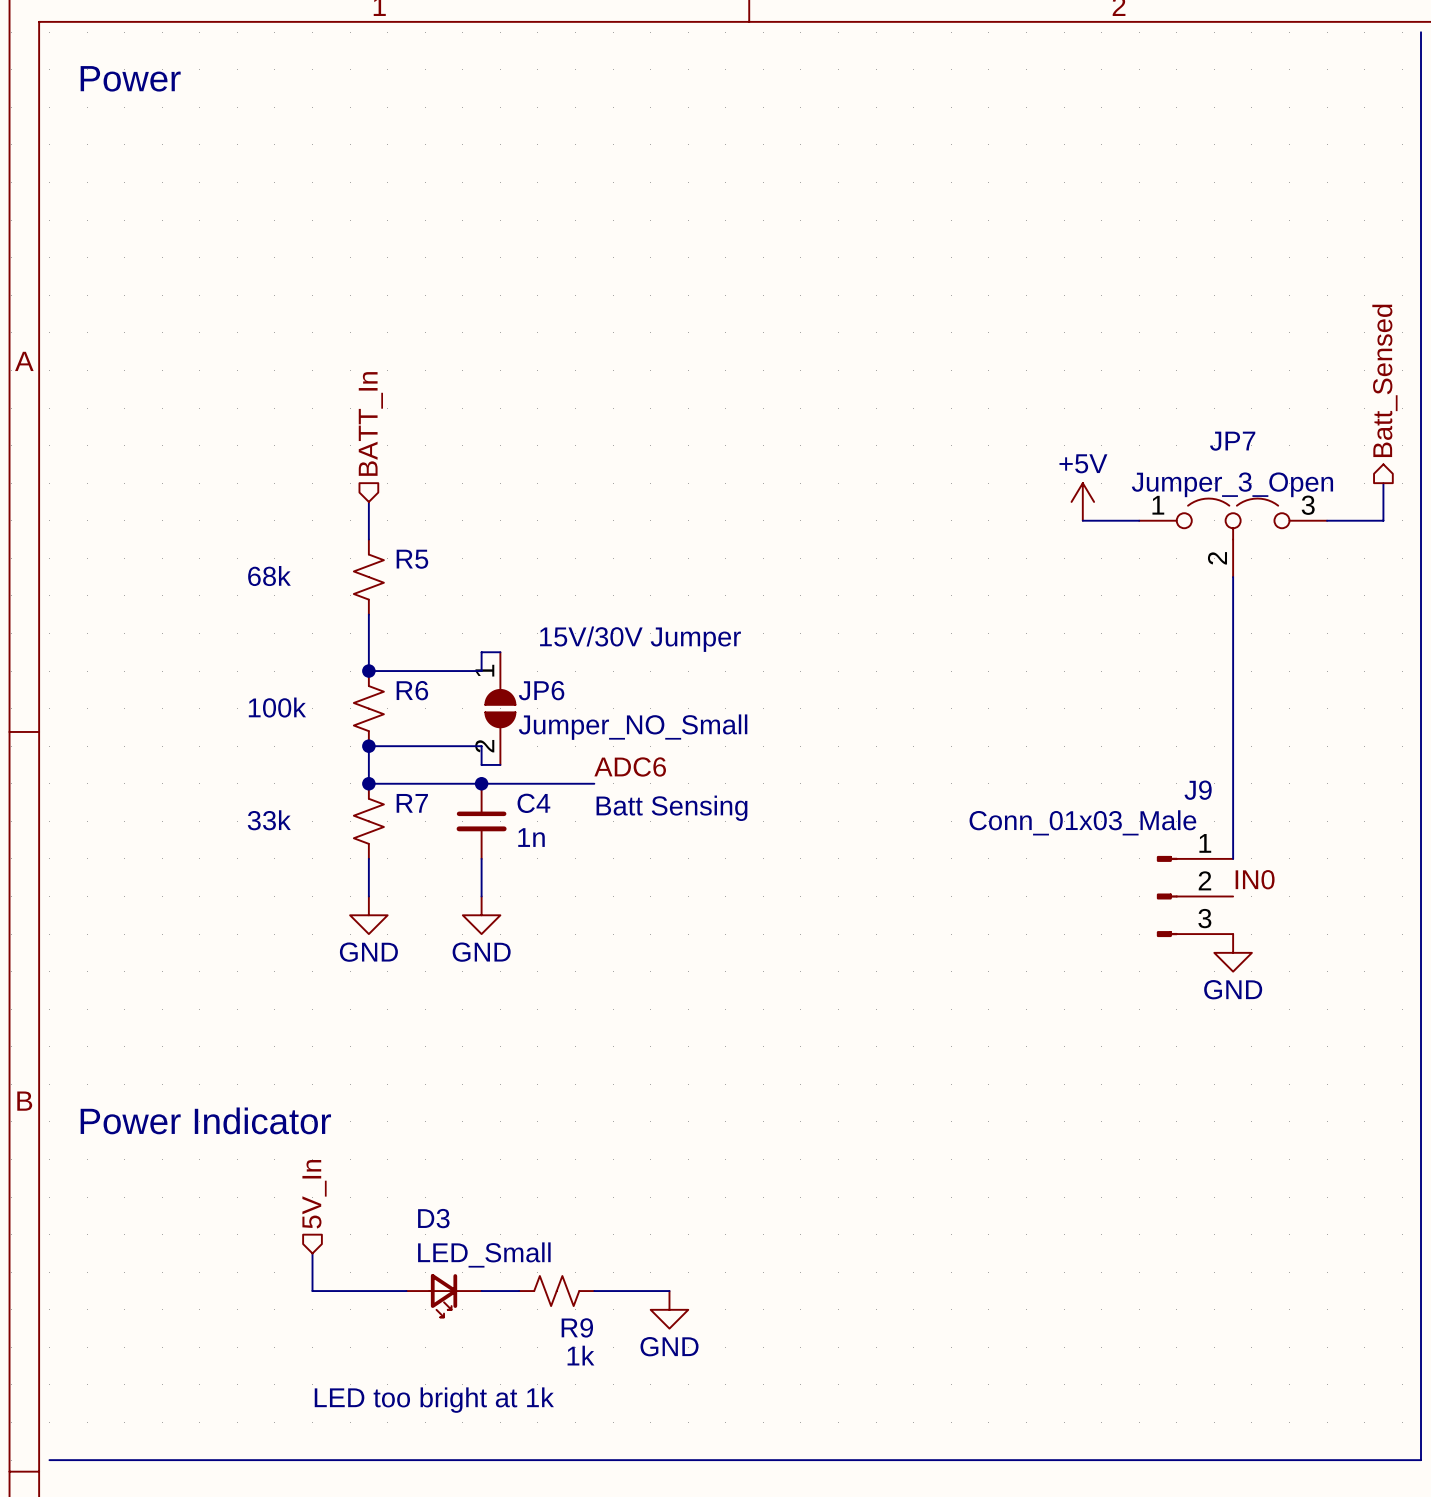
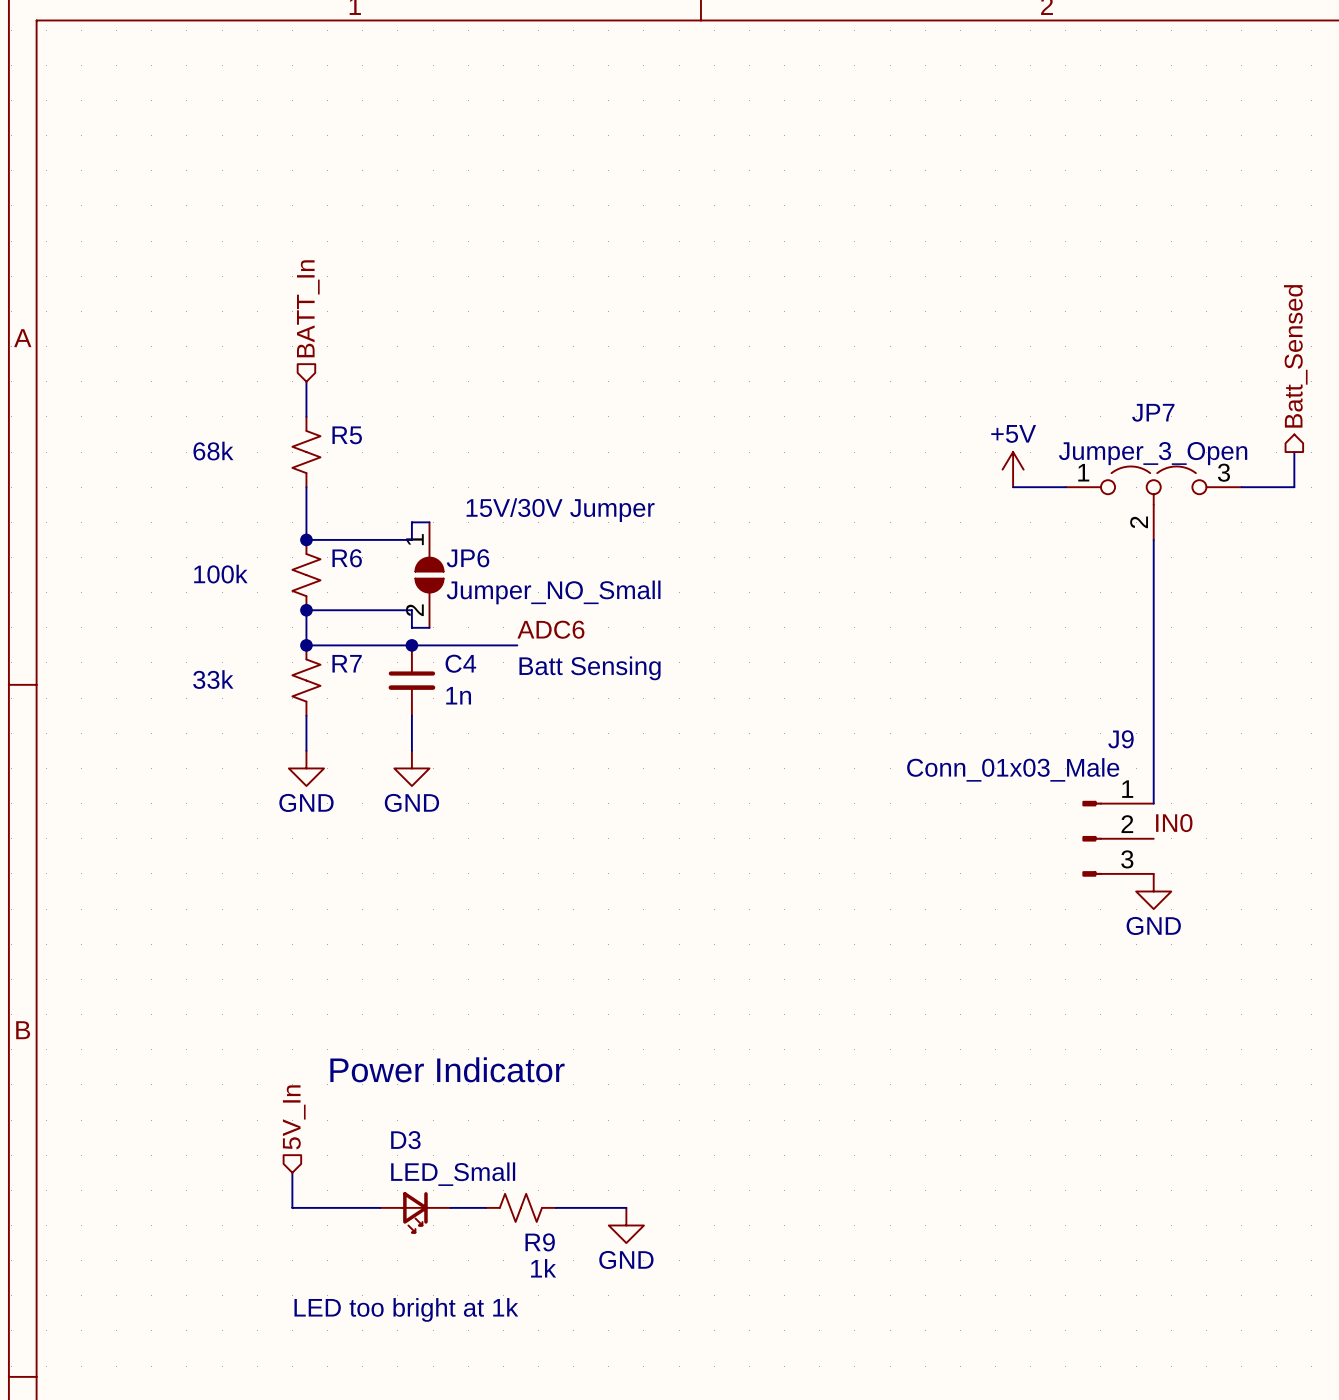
line: (1421, 32) (1421, 1460) (49, 1460) -> none
text: Power (130, 78) -> none
hierarchical label position: BATT_In (370, 423) -> BATT_In (308, 308)
wire: (368, 501) (368, 539) -> (306, 381) (306, 416)
wire: none -> (306, 487) (306, 539) (411, 539) (411, 522) (429, 522)
junction: none -> (306, 539)
R5 position: (368, 577) -> (306, 452)
wire: (368, 614) (368, 671) (440, 671) -> (517, 645) (306, 645) (306, 610) (411, 610) (411, 627)
text position: 15V/30V Jumper (640, 639) -> 15V/30V Jumper (560, 510)
junction: none -> (306, 610)
wire: (500, 652) (481, 652) (481, 671) (459, 671) -> none
junction: (368, 671) -> none
junction: none -> (306, 645)
junction: none -> (411, 645)
R6 position: (368, 708) -> (306, 575)
JP6 position: (500, 708) -> (429, 575)
junction: (368, 746) -> none
wire: (500, 764) (481, 764) (481, 746) (368, 746) (368, 783) (594, 783) -> none
label position: ADC6 (630, 766) -> ADC6 (550, 629)
junction: (368, 783) -> none
junction: (481, 783) -> none
text position: Batt Sensing (671, 808) -> Batt Sensing (590, 668)
power symbol: none -> GND (306, 768)
R7 position: (368, 821) -> (306, 680)
power symbol: none -> GND (411, 768)
C4 position: (481, 821) -> (411, 680)
wire: (368, 858) (368, 896) -> (306, 715) (306, 750)
wire: (481, 858) (481, 896) -> (411, 715) (411, 750)
power symbol: GND (368, 915) -> none
power symbol: GND (481, 915) -> none
text position: Power Indicator (205, 1120) -> Power Indicator (447, 1069)

